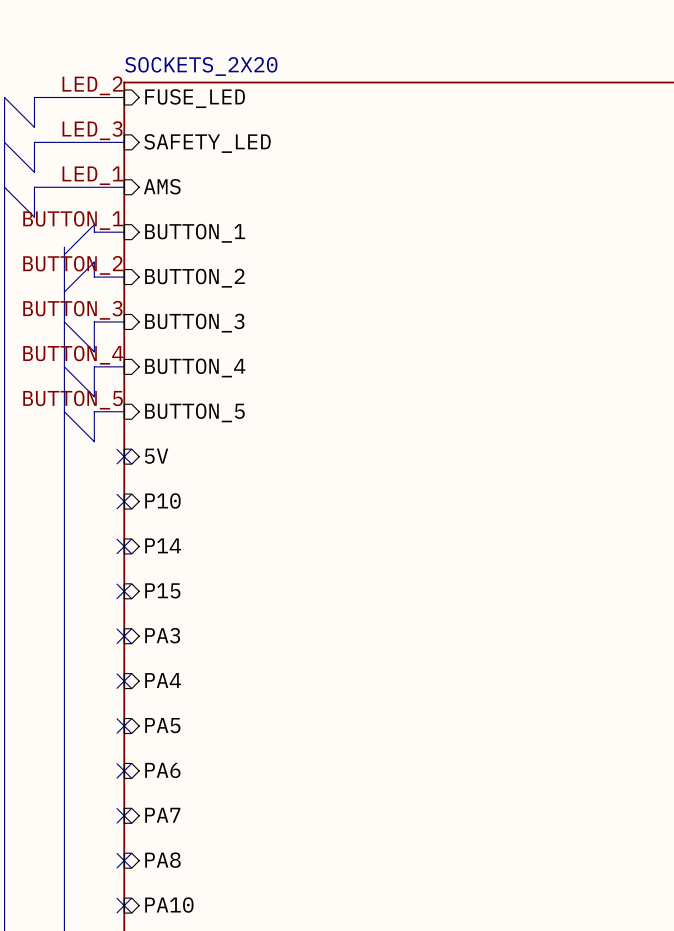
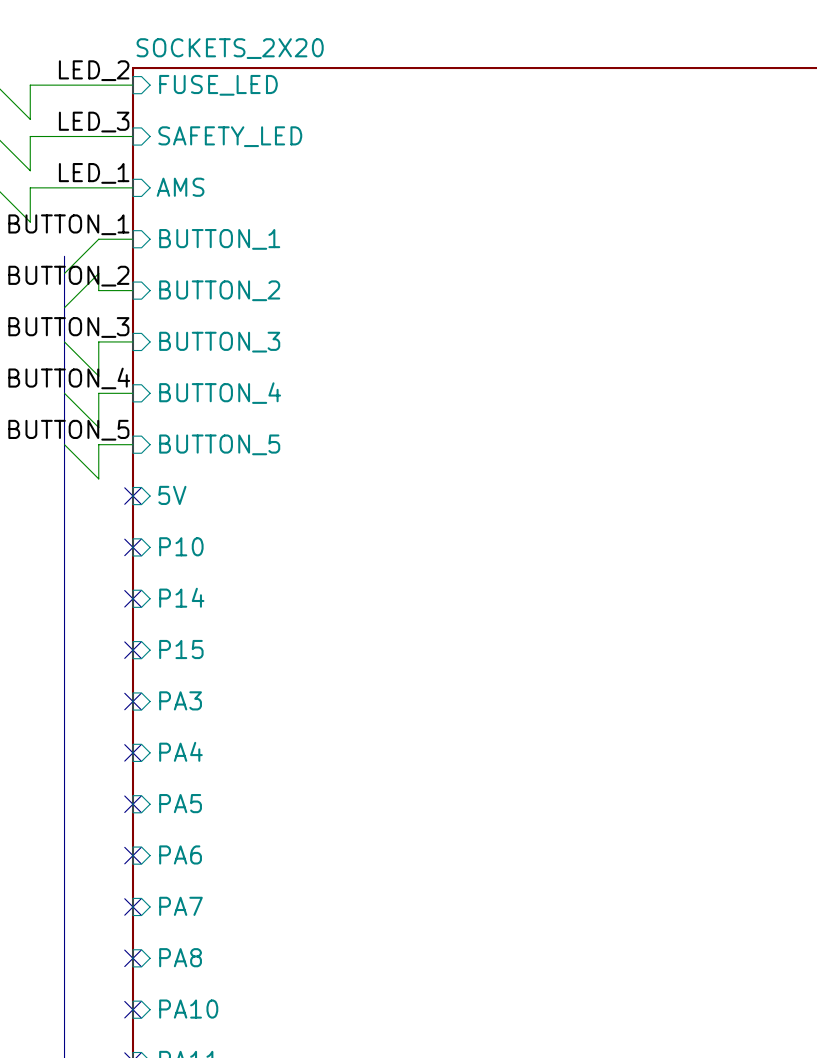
wire: (94, 224) (94, 232) -> (64, 273) (98, 239)
wire: (94, 224) (64, 254) -> none

